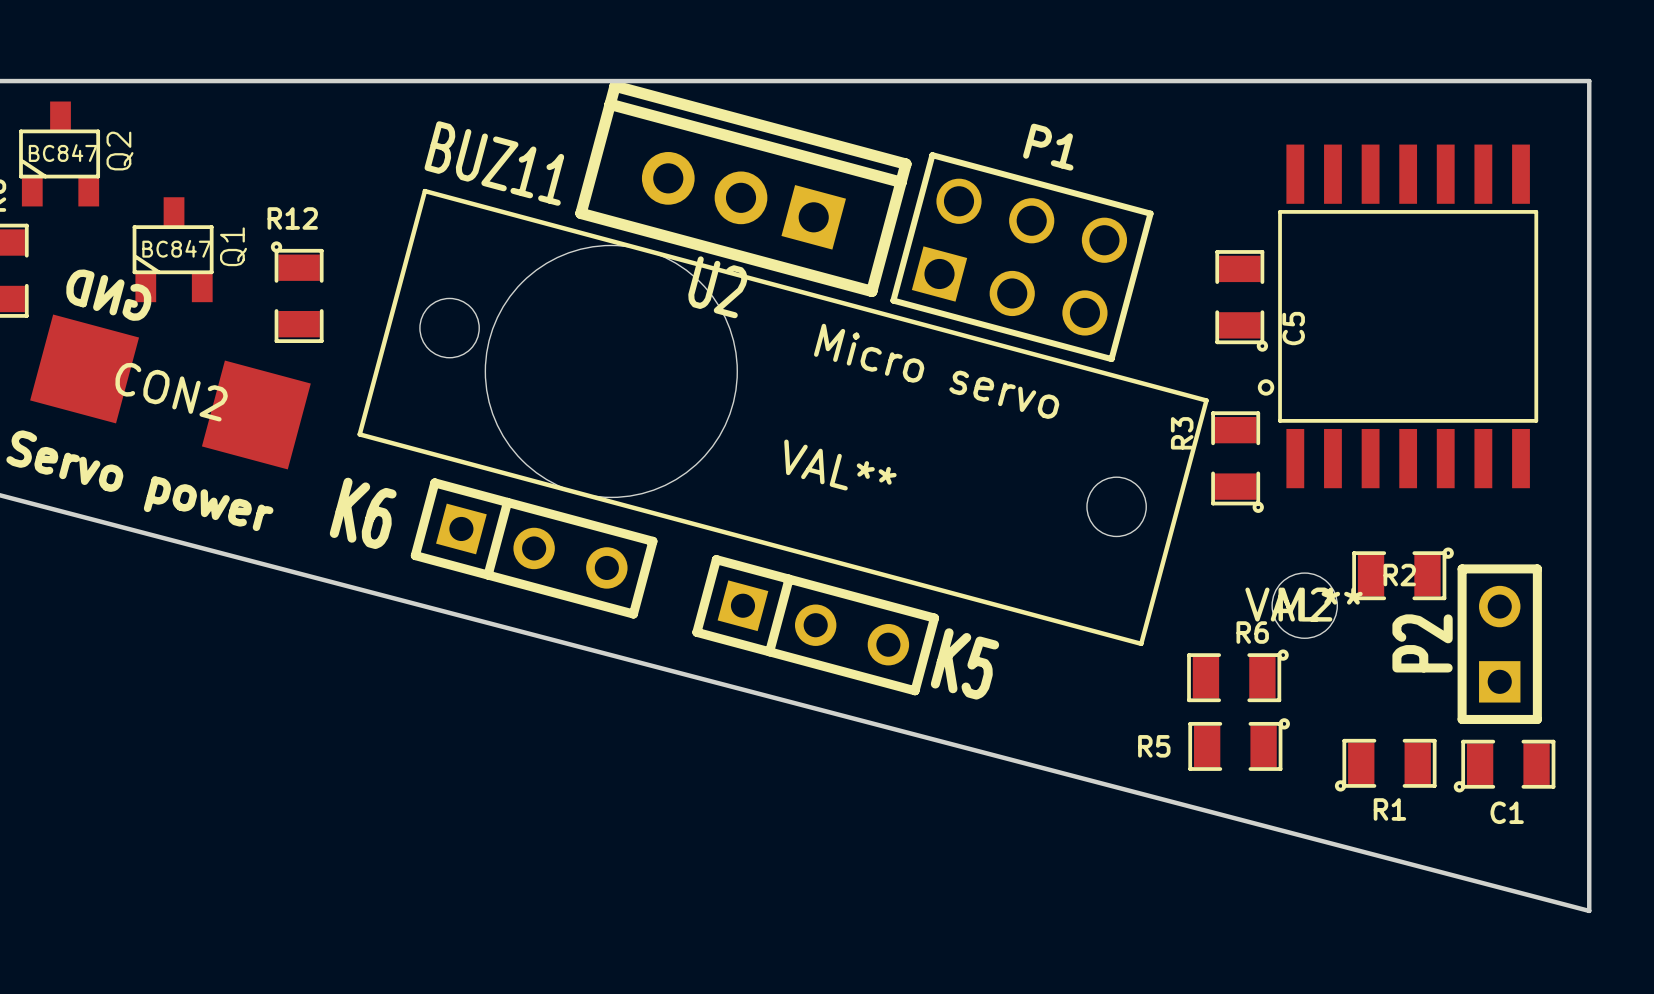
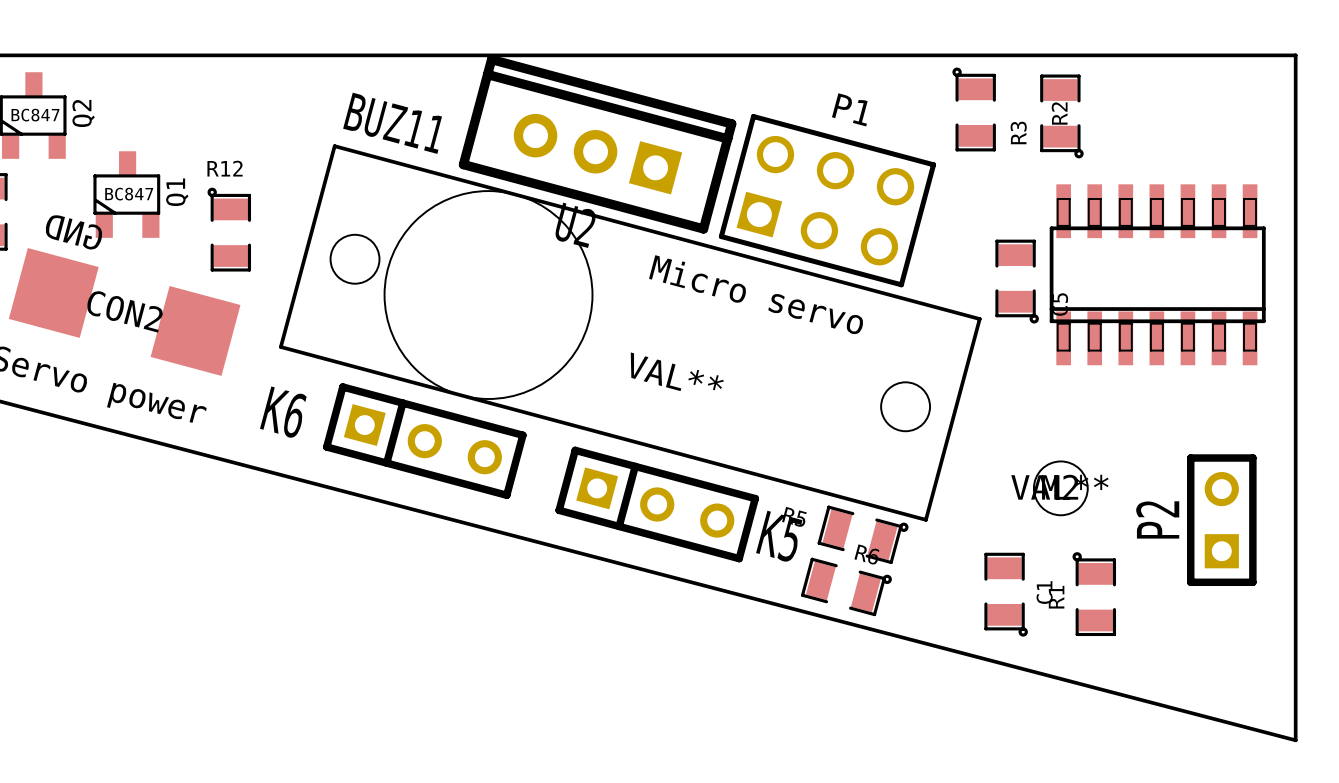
C5 position: (1241, 300) -> (1017, 281)
part: (1397, 316) -> none
part: none -> (1157, 274)
R3 rotation: 0° (1237, 462) -> 180° (974, 109)
R3 position: (1237, 462) -> (974, 109)
R2 rotation: 0° (1403, 573) -> 90° clockwise (1061, 116)
R2 position: (1403, 573) -> (1061, 116)
R6 rotation: 0° (1237, 675) -> 15° clockwise (846, 586)
R6 position: (1237, 675) -> (846, 586)
R5 rotation: 0° (1239, 744) -> 15° clockwise (863, 534)
R5 position: (1239, 744) -> (863, 534)
R1 rotation: 0° (1385, 765) -> 90° clockwise (1094, 594)
C1 rotation: 0° (1504, 766) -> 90° counterclockwise (1006, 594)
C1 position: (1504, 766) -> (1006, 594)

